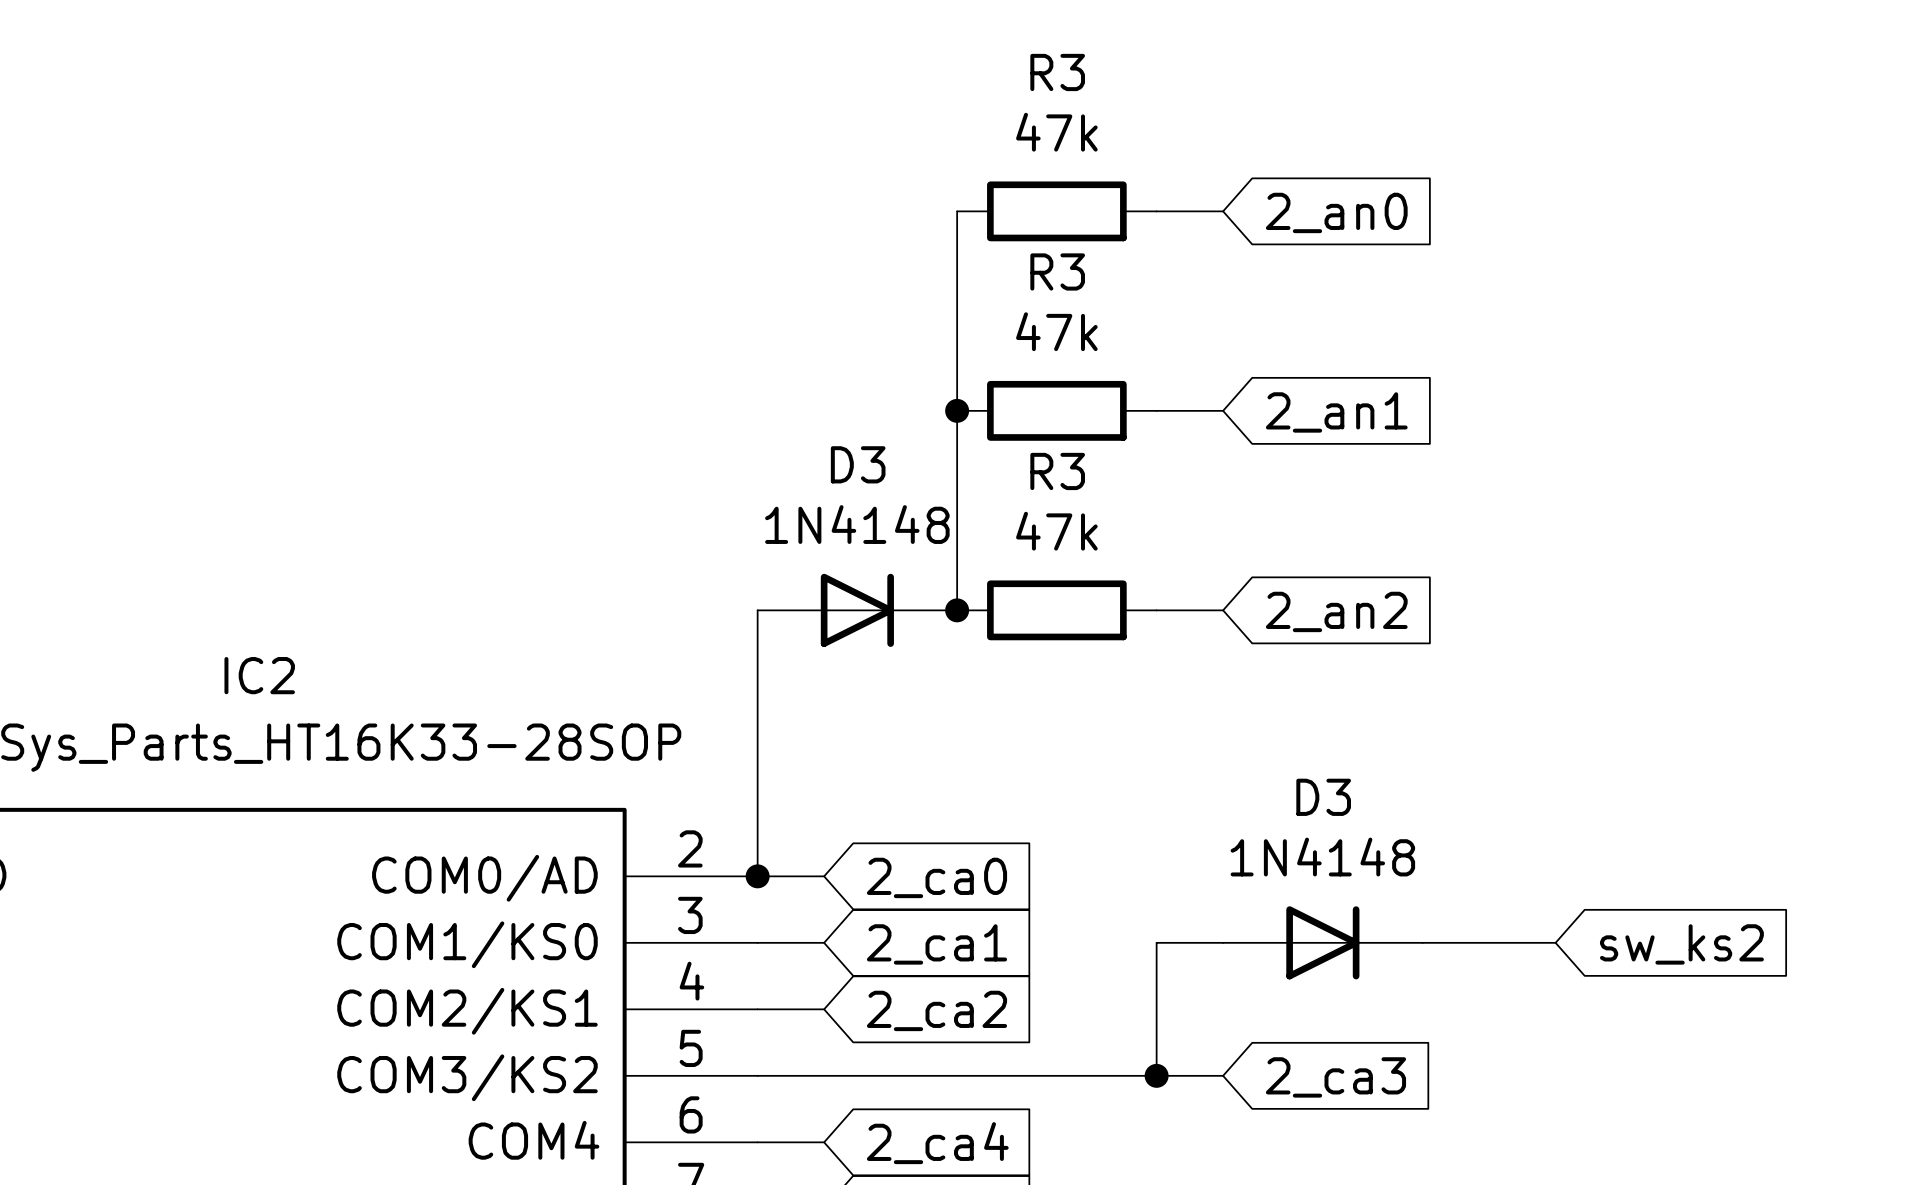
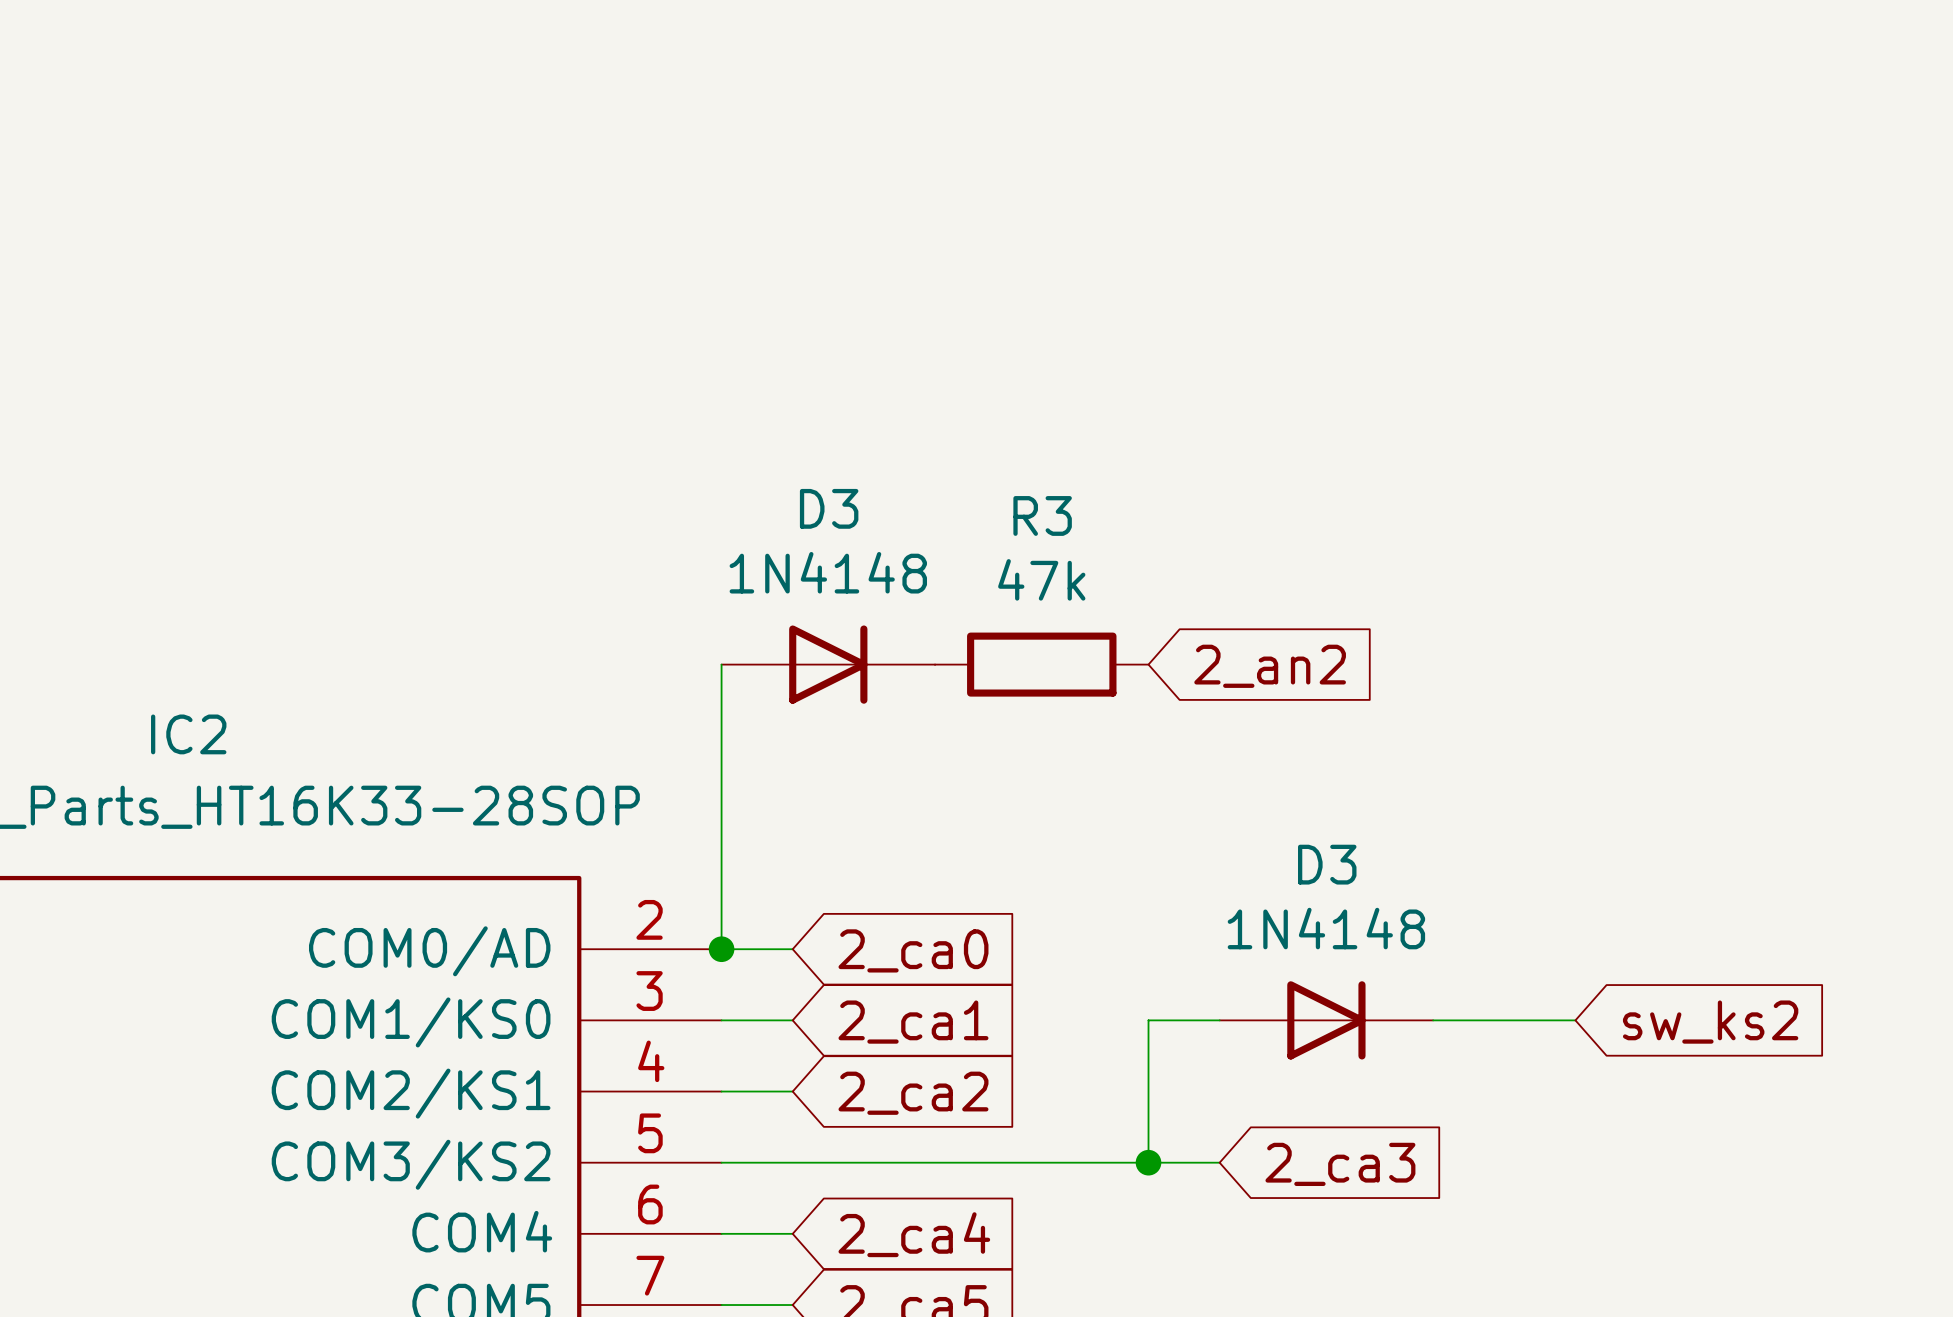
wire: (957, 211) (957, 610) -> none
R3: 47k (1056, 211) -> none
wire: (1156, 211) (1223, 211) -> none
global label: 2_an0 (1336, 212) -> none
junction: (957, 410) -> none
R3: 47k (1056, 410) -> none
wire: (1156, 410) (1223, 410) -> none
global label: 2_an1 (1336, 412) -> none
junction: (957, 610) -> none
wire: (1156, 610) (1223, 610) -> none
global label position: 2_an2 (1336, 611) -> 2_an2 (1270, 666)

